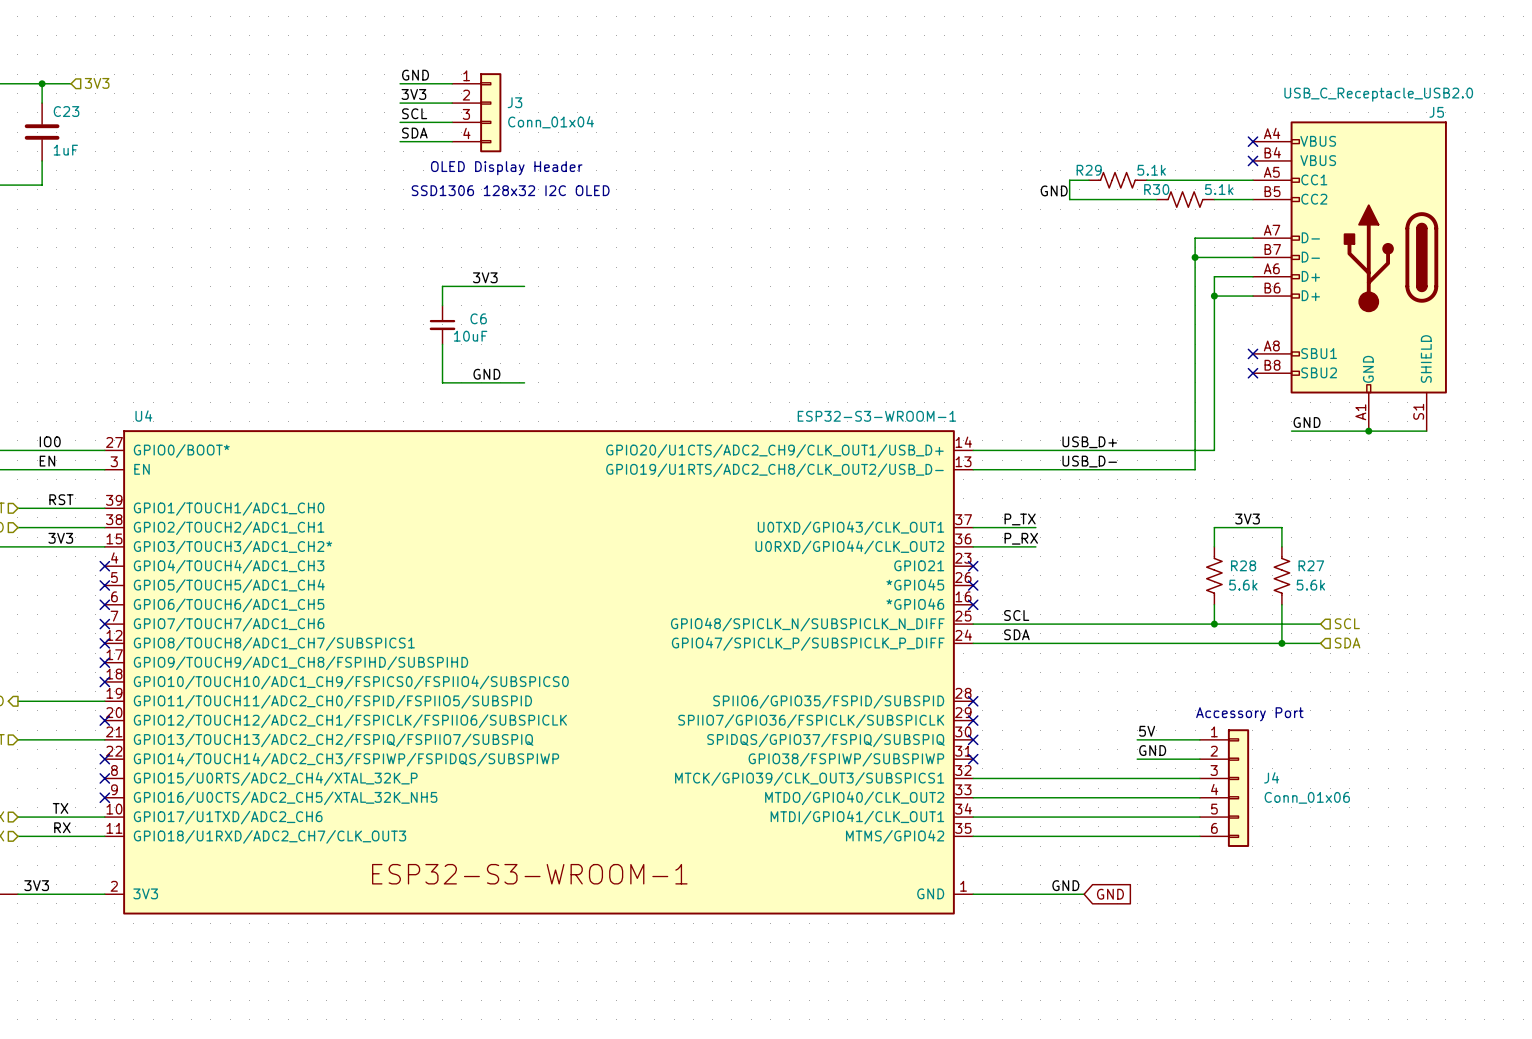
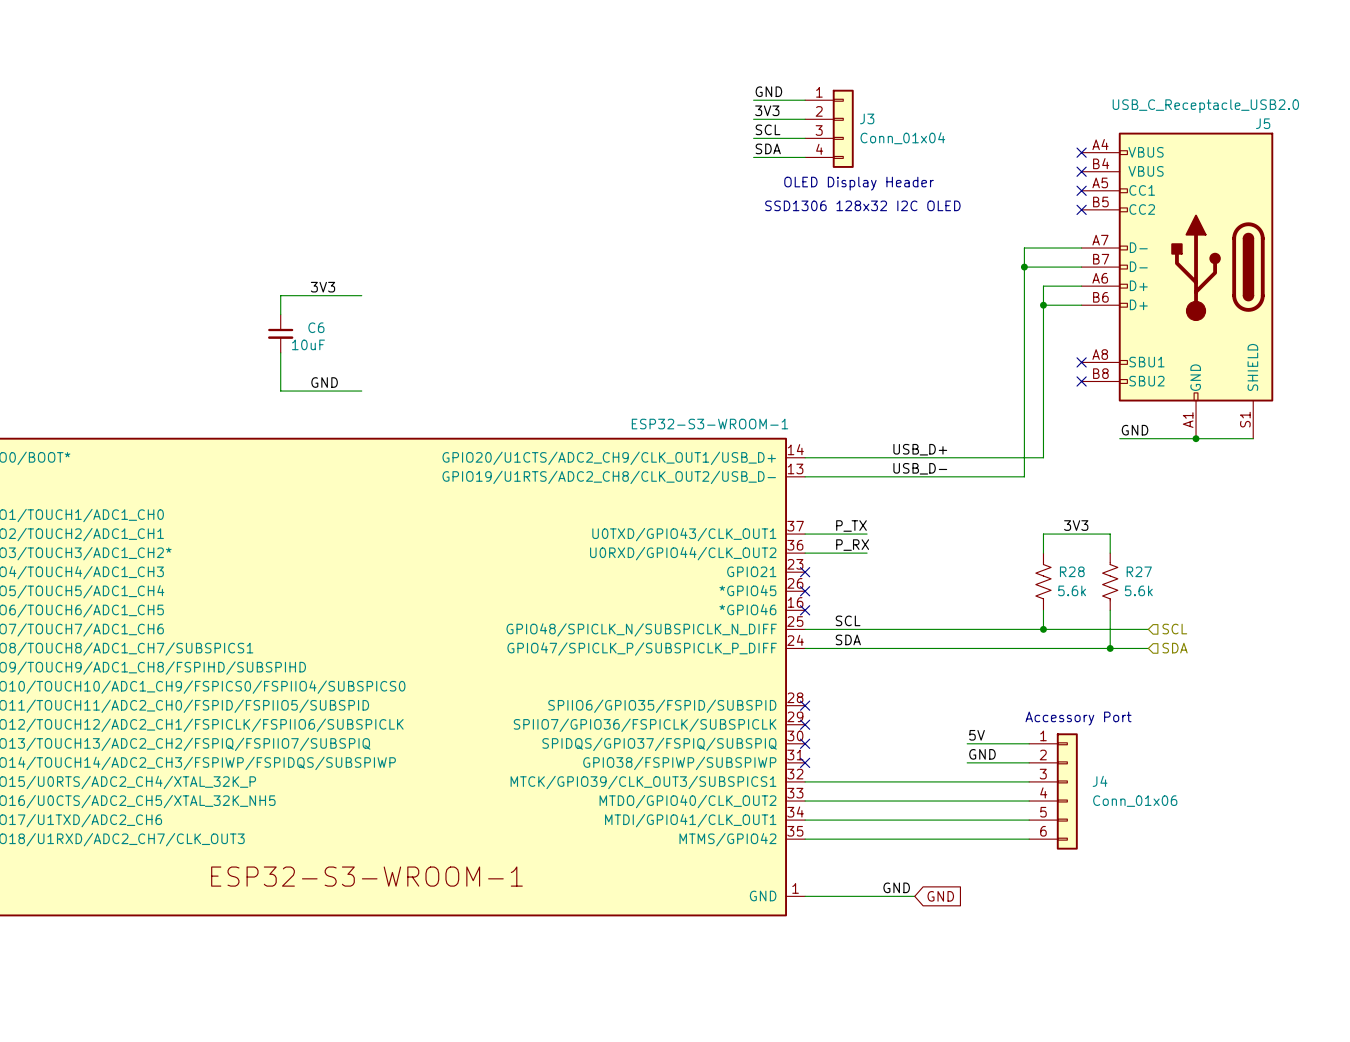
label: GND (415, 75) -> none
wire: (400, 83) (452, 83) -> none
wire: none -> (753, 100) (805, 100)
label: 3V3 (413, 94) -> none
label: none -> 3V3 (767, 110)
wire: (400, 103) (452, 103) -> none
wire: none -> (753, 119) (805, 119)
J3 position: (476, 112) -> (829, 128)
label: SCL (414, 113) -> none
label: none -> SCL (767, 129)
wire: (400, 122) (452, 122) -> none
wire: none -> (753, 138) (805, 138)
label: SDA (414, 133) -> none
label: none -> SDA (768, 148)
wire: (400, 141) (452, 141) -> none
wire: none -> (753, 157) (805, 157)
text: OLED Display Header (506, 168) -> none
text: none -> OLED Display Header (859, 183)
wire: (1088, 180) (1069, 180) (1069, 199) (1156, 199) -> none
R29: 5.1k (1117, 180) -> none
wire: (1146, 180) (1252, 180) -> none
no-connect mark: none -> (1081, 190)
text: SSD1306 128x32 I2C OLED (510, 190) -> none
label position: GND (1054, 190) -> GND (768, 91)
text: none -> SSD1306 128x32 I2C OLED (862, 205)
R30: 5.1k (1185, 199) -> none
wire: (1214, 199) (1252, 199) -> none
no-connect mark: none -> (1081, 209)

